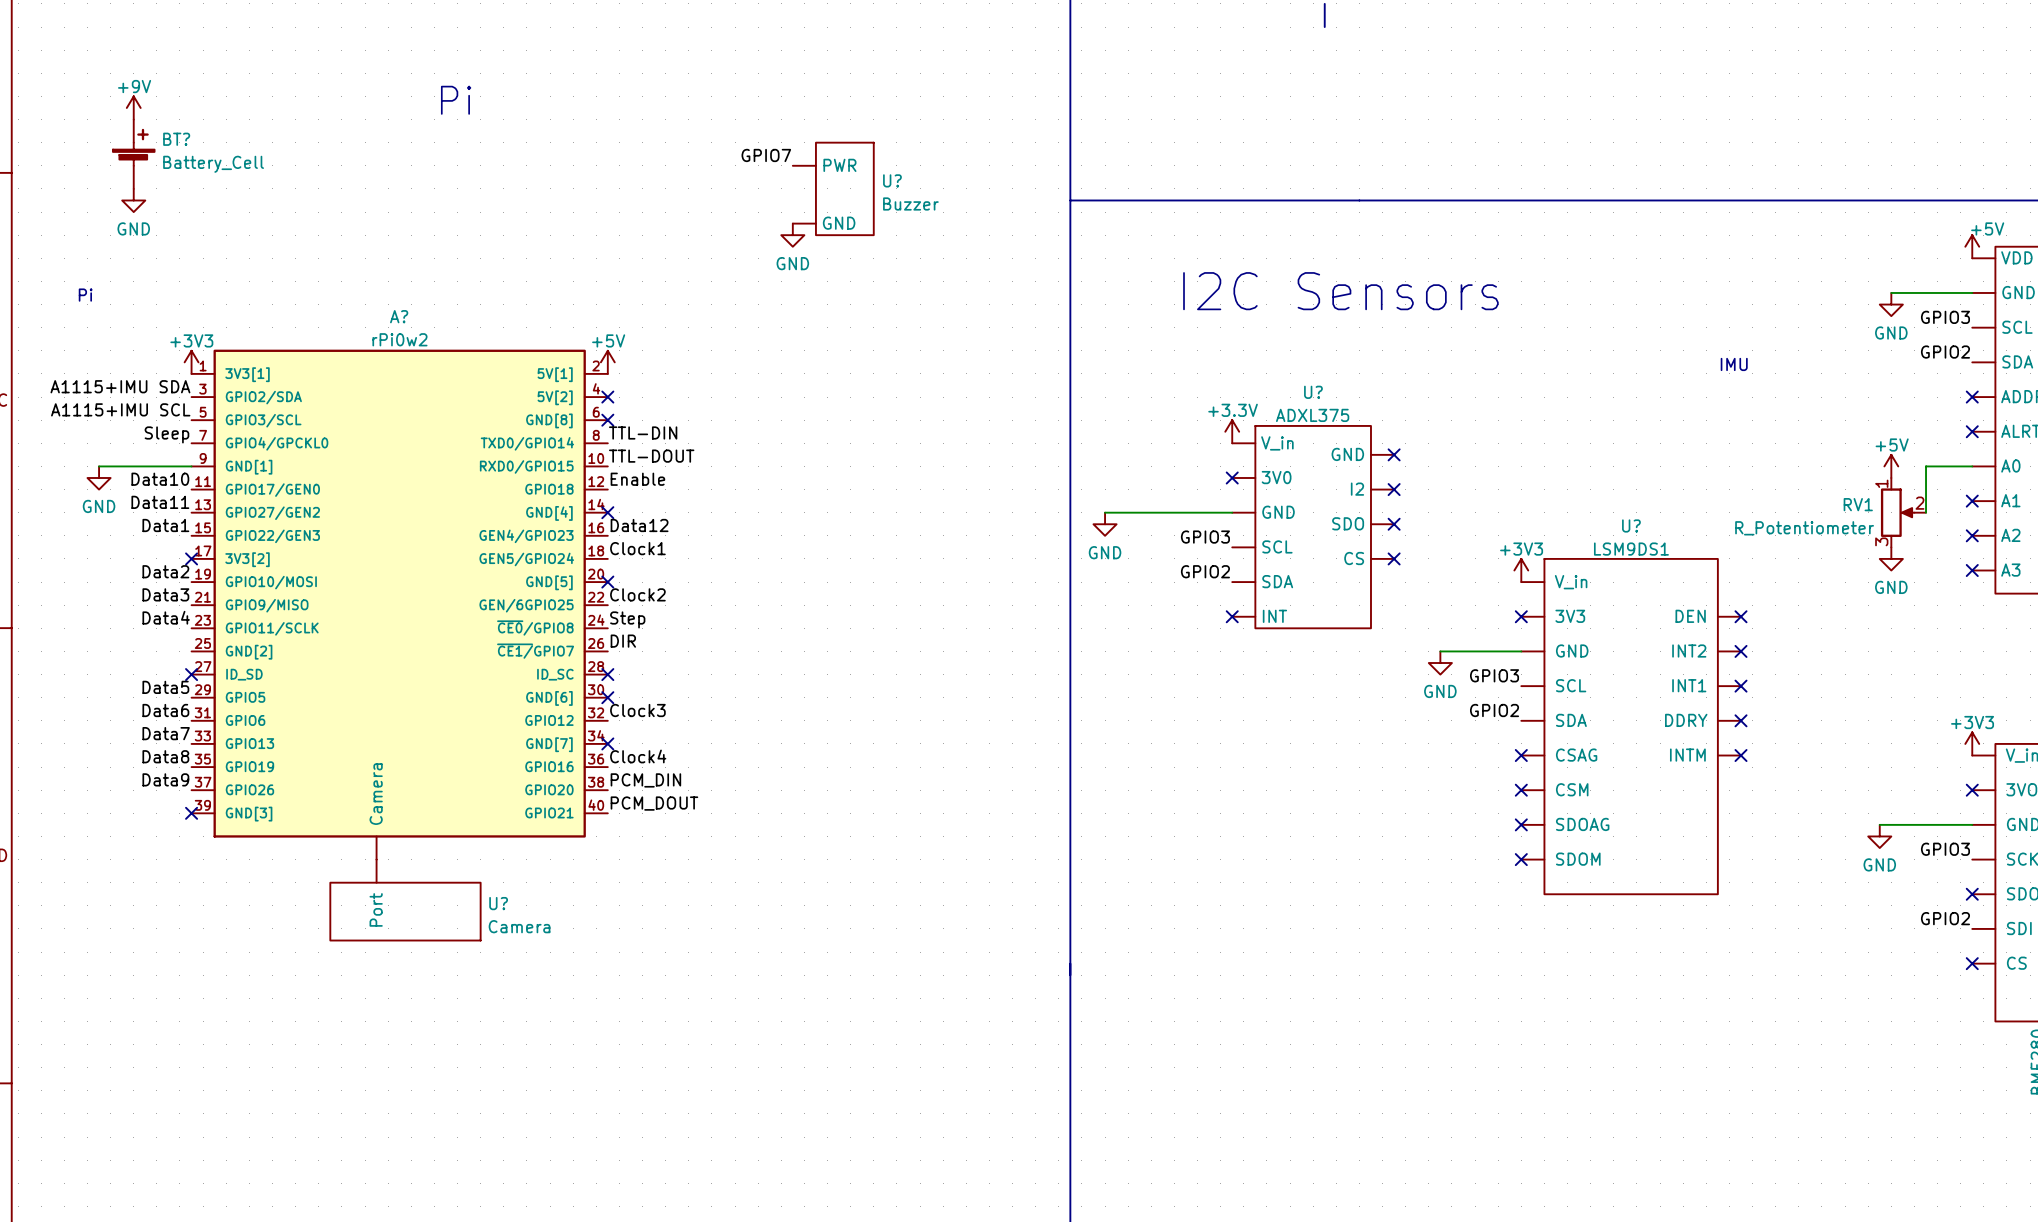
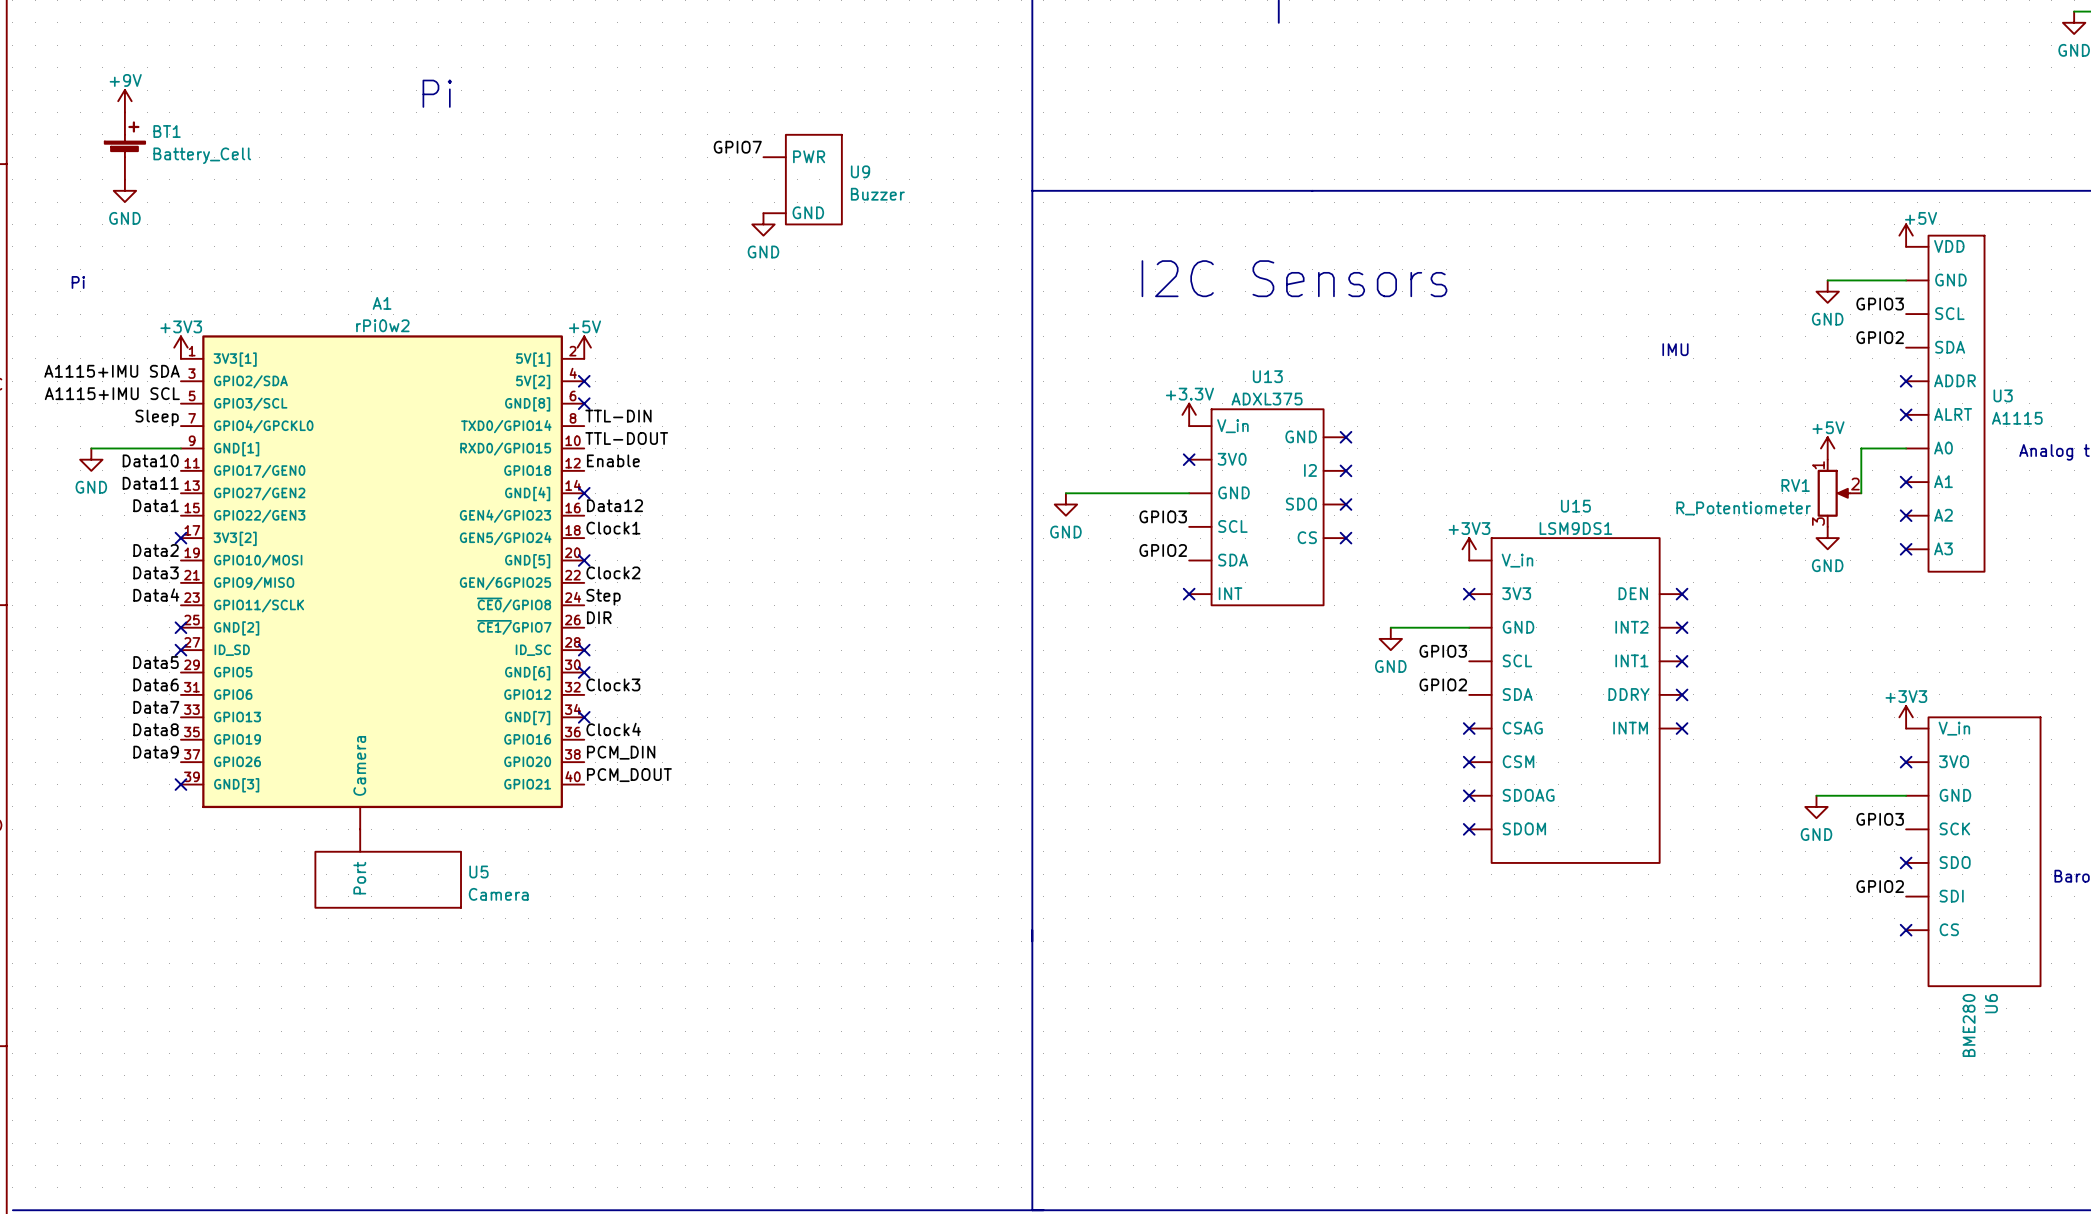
BT? name: BT? (176, 139) -> BT1 (167, 131)
U? name: U? (892, 180) -> U9 (860, 171)
A? name: A? (399, 316) -> A1 (382, 303)
U? name: U? (1313, 392) -> U13 (1267, 376)
U? name: U? (1631, 525) -> U15 (1575, 506)
no-connect mark: none -> (180, 627)
U? name: U? (498, 903) -> U5 (478, 871)

